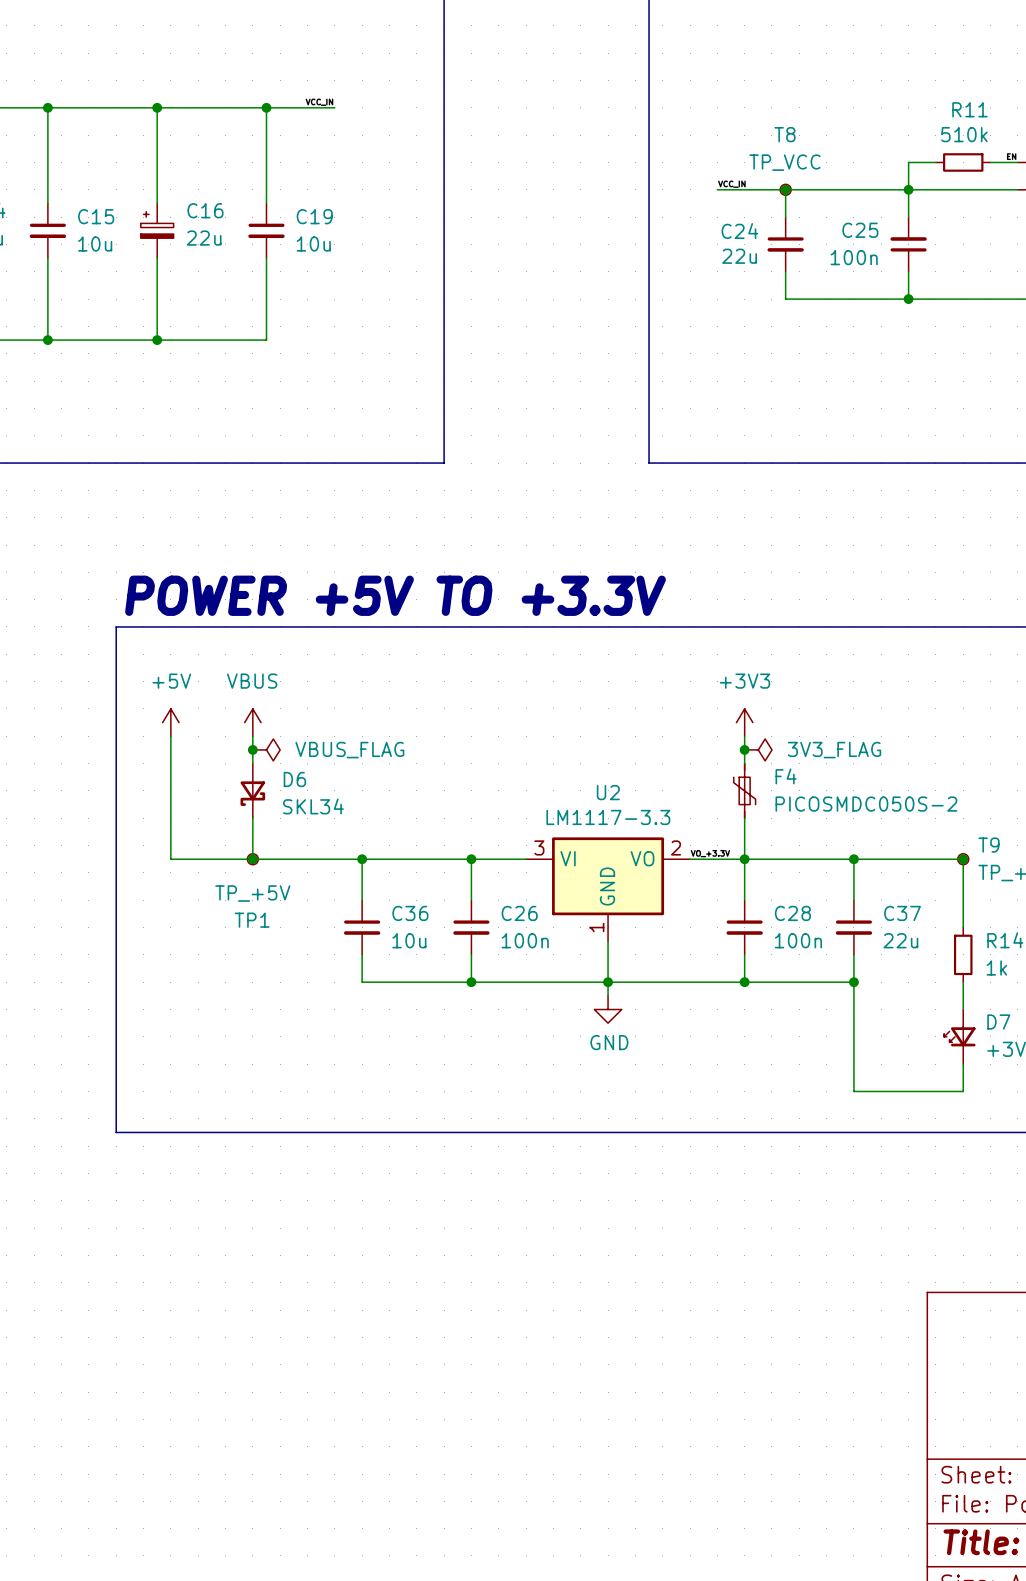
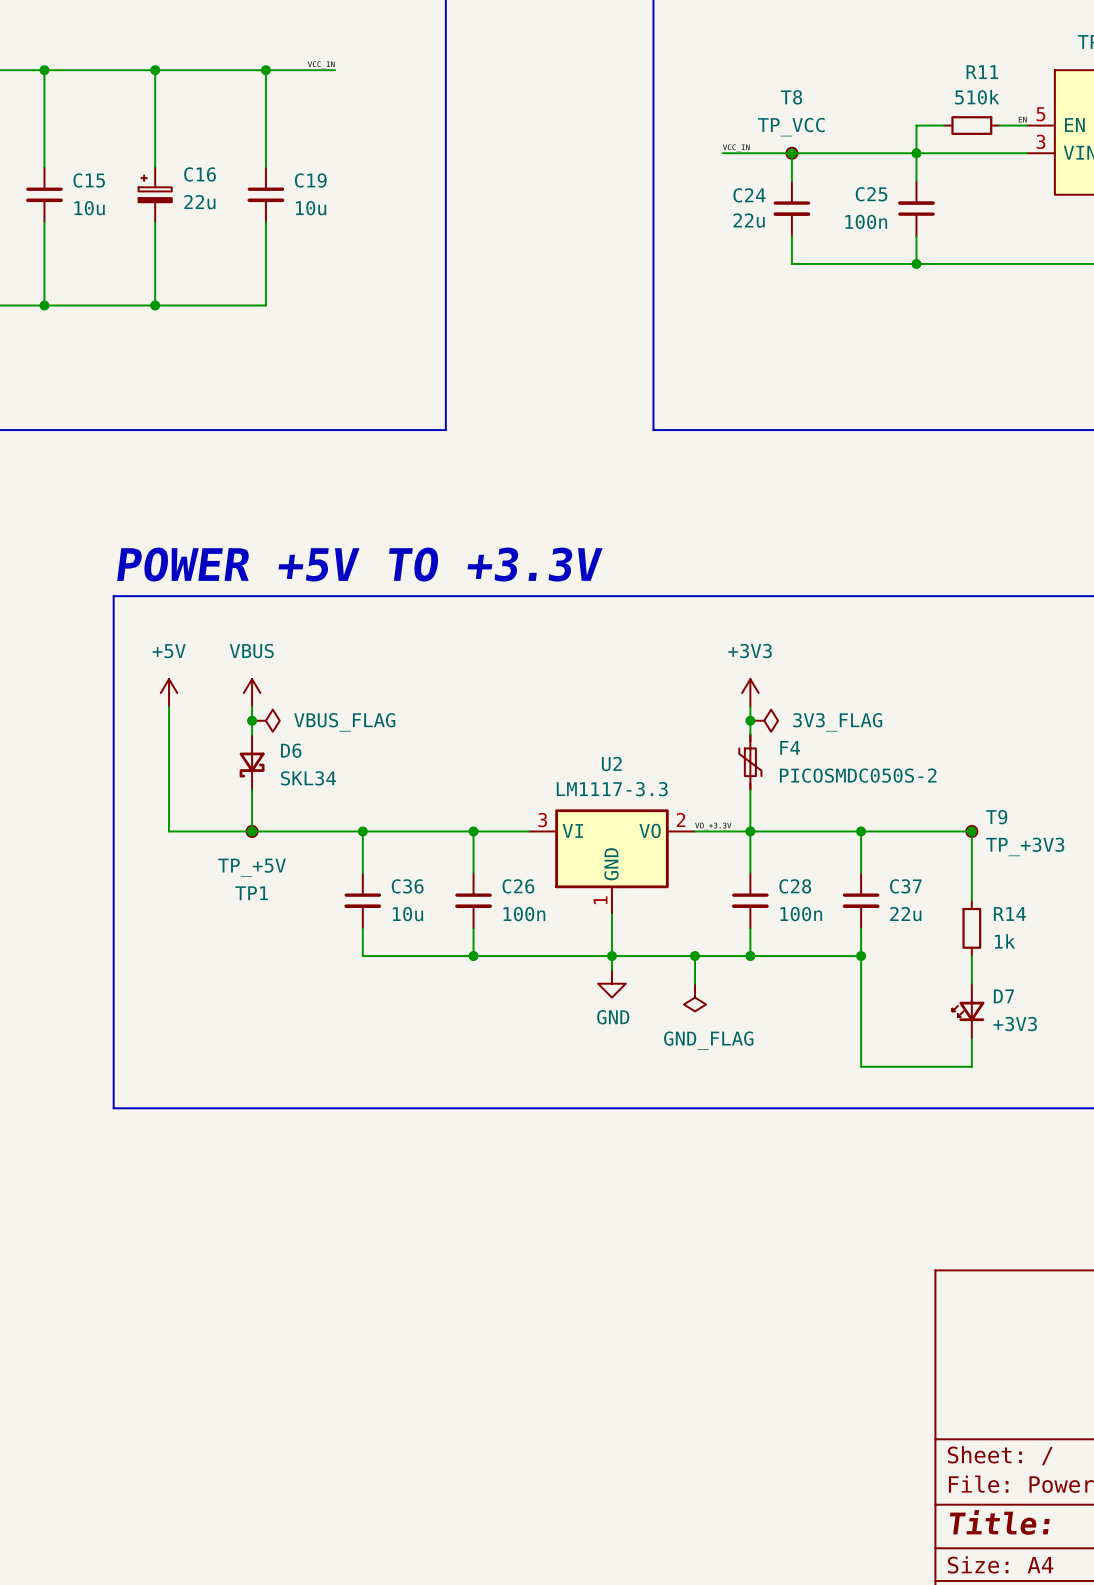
wire: none -> (695, 956) (695, 983)
junction: none -> (695, 956)
power symbol: none -> GND_FLAG (695, 997)

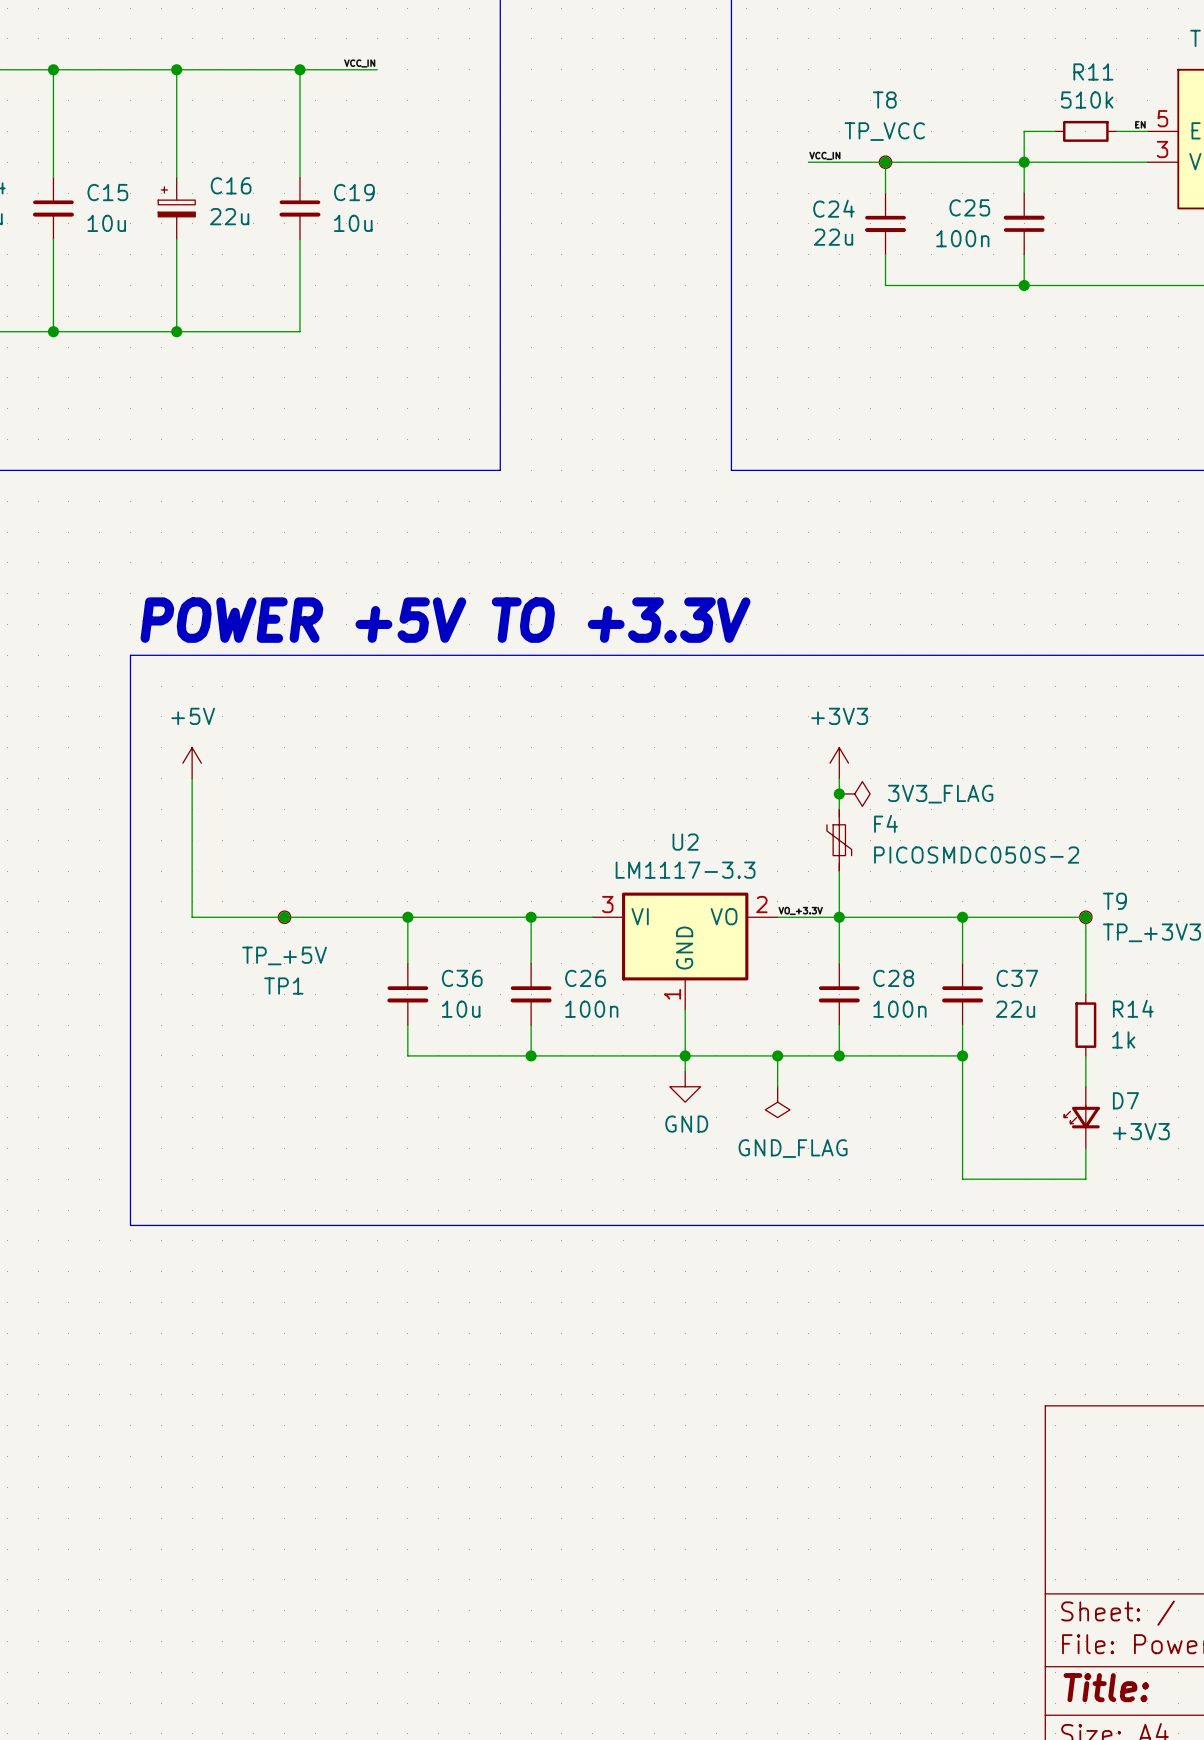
power symbol: VBUS (252, 693) -> none
wire: (252, 706) (252, 734) -> none
junction: (252, 720) -> none
power symbol: VBUS_FLAG (265, 720) -> none
D6: SKL34 (252, 762) -> none
wire: (252, 789) (252, 831) -> none

